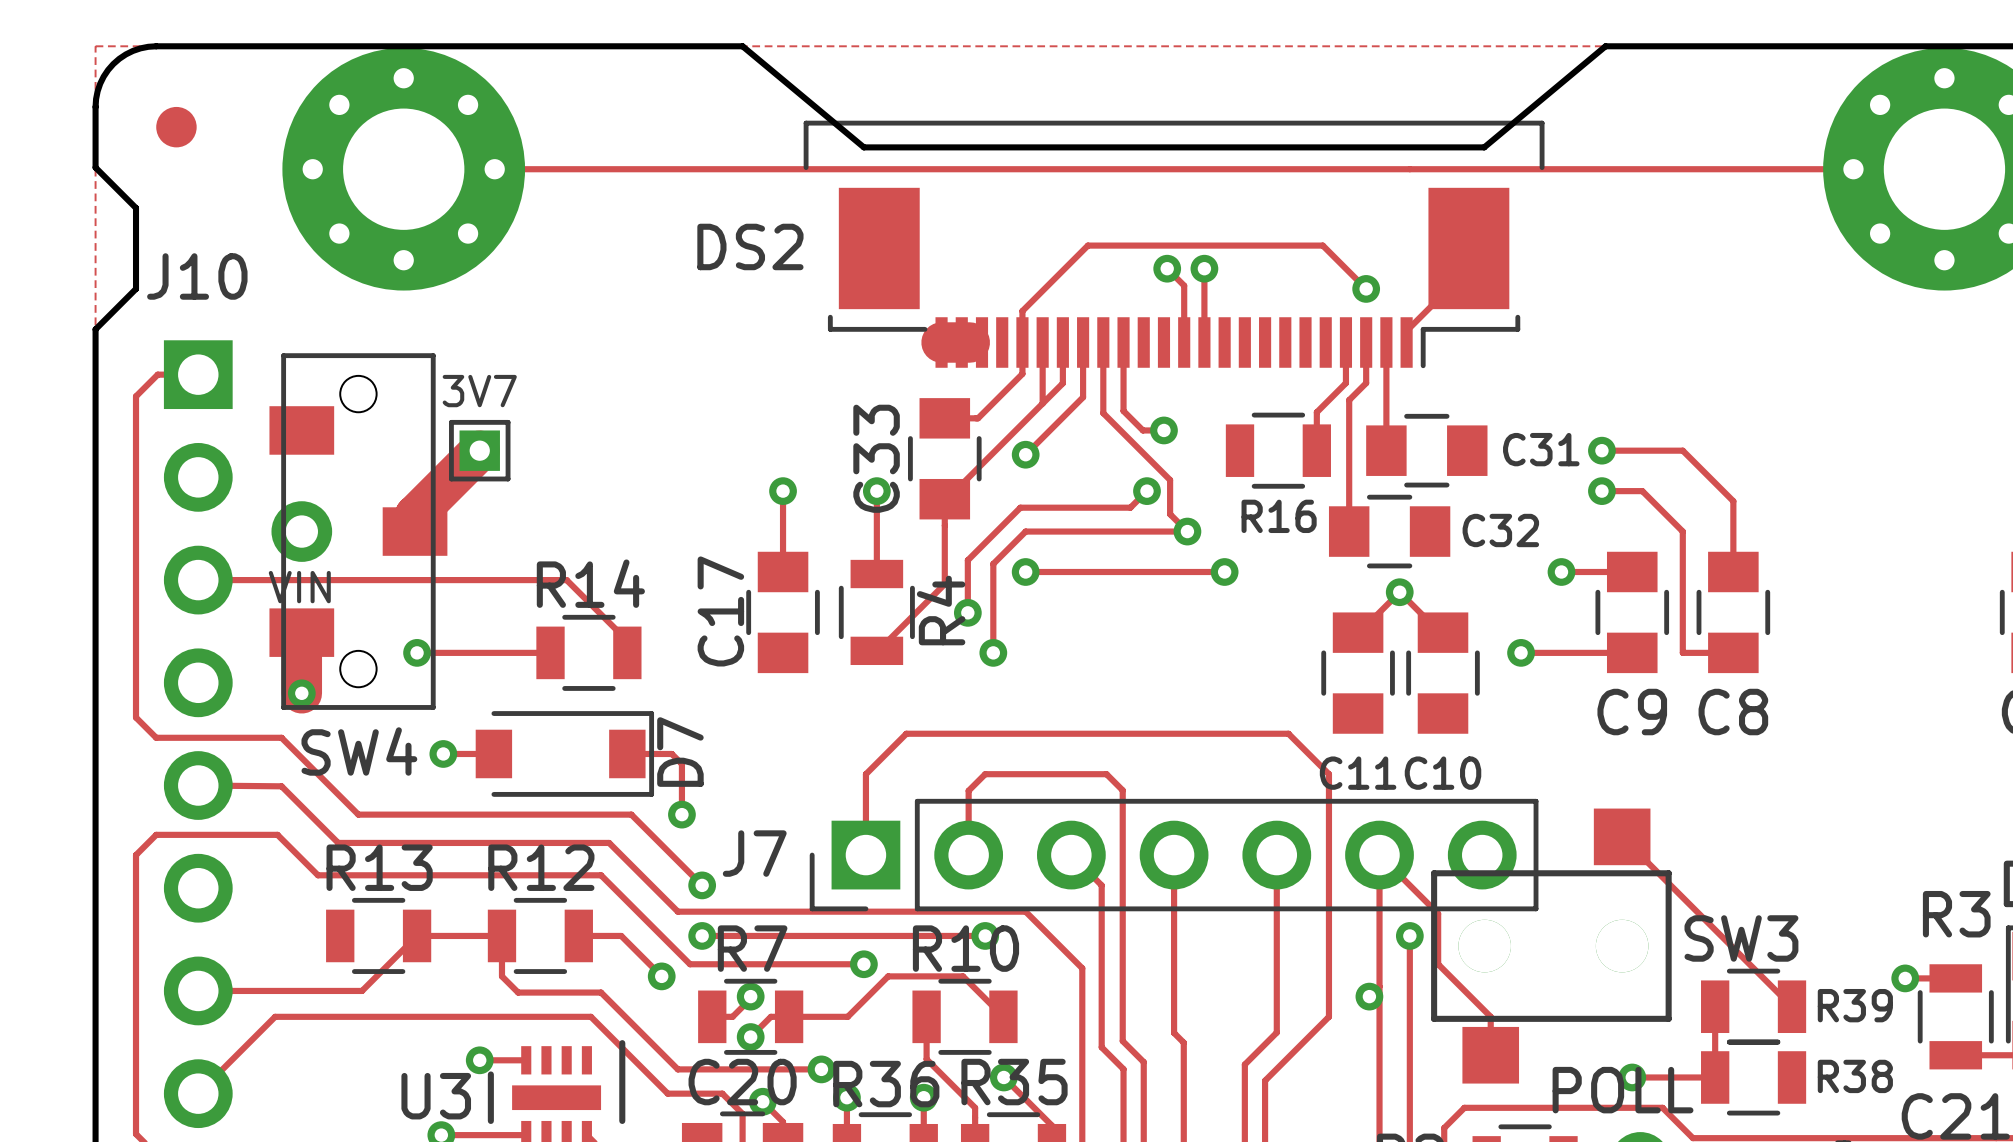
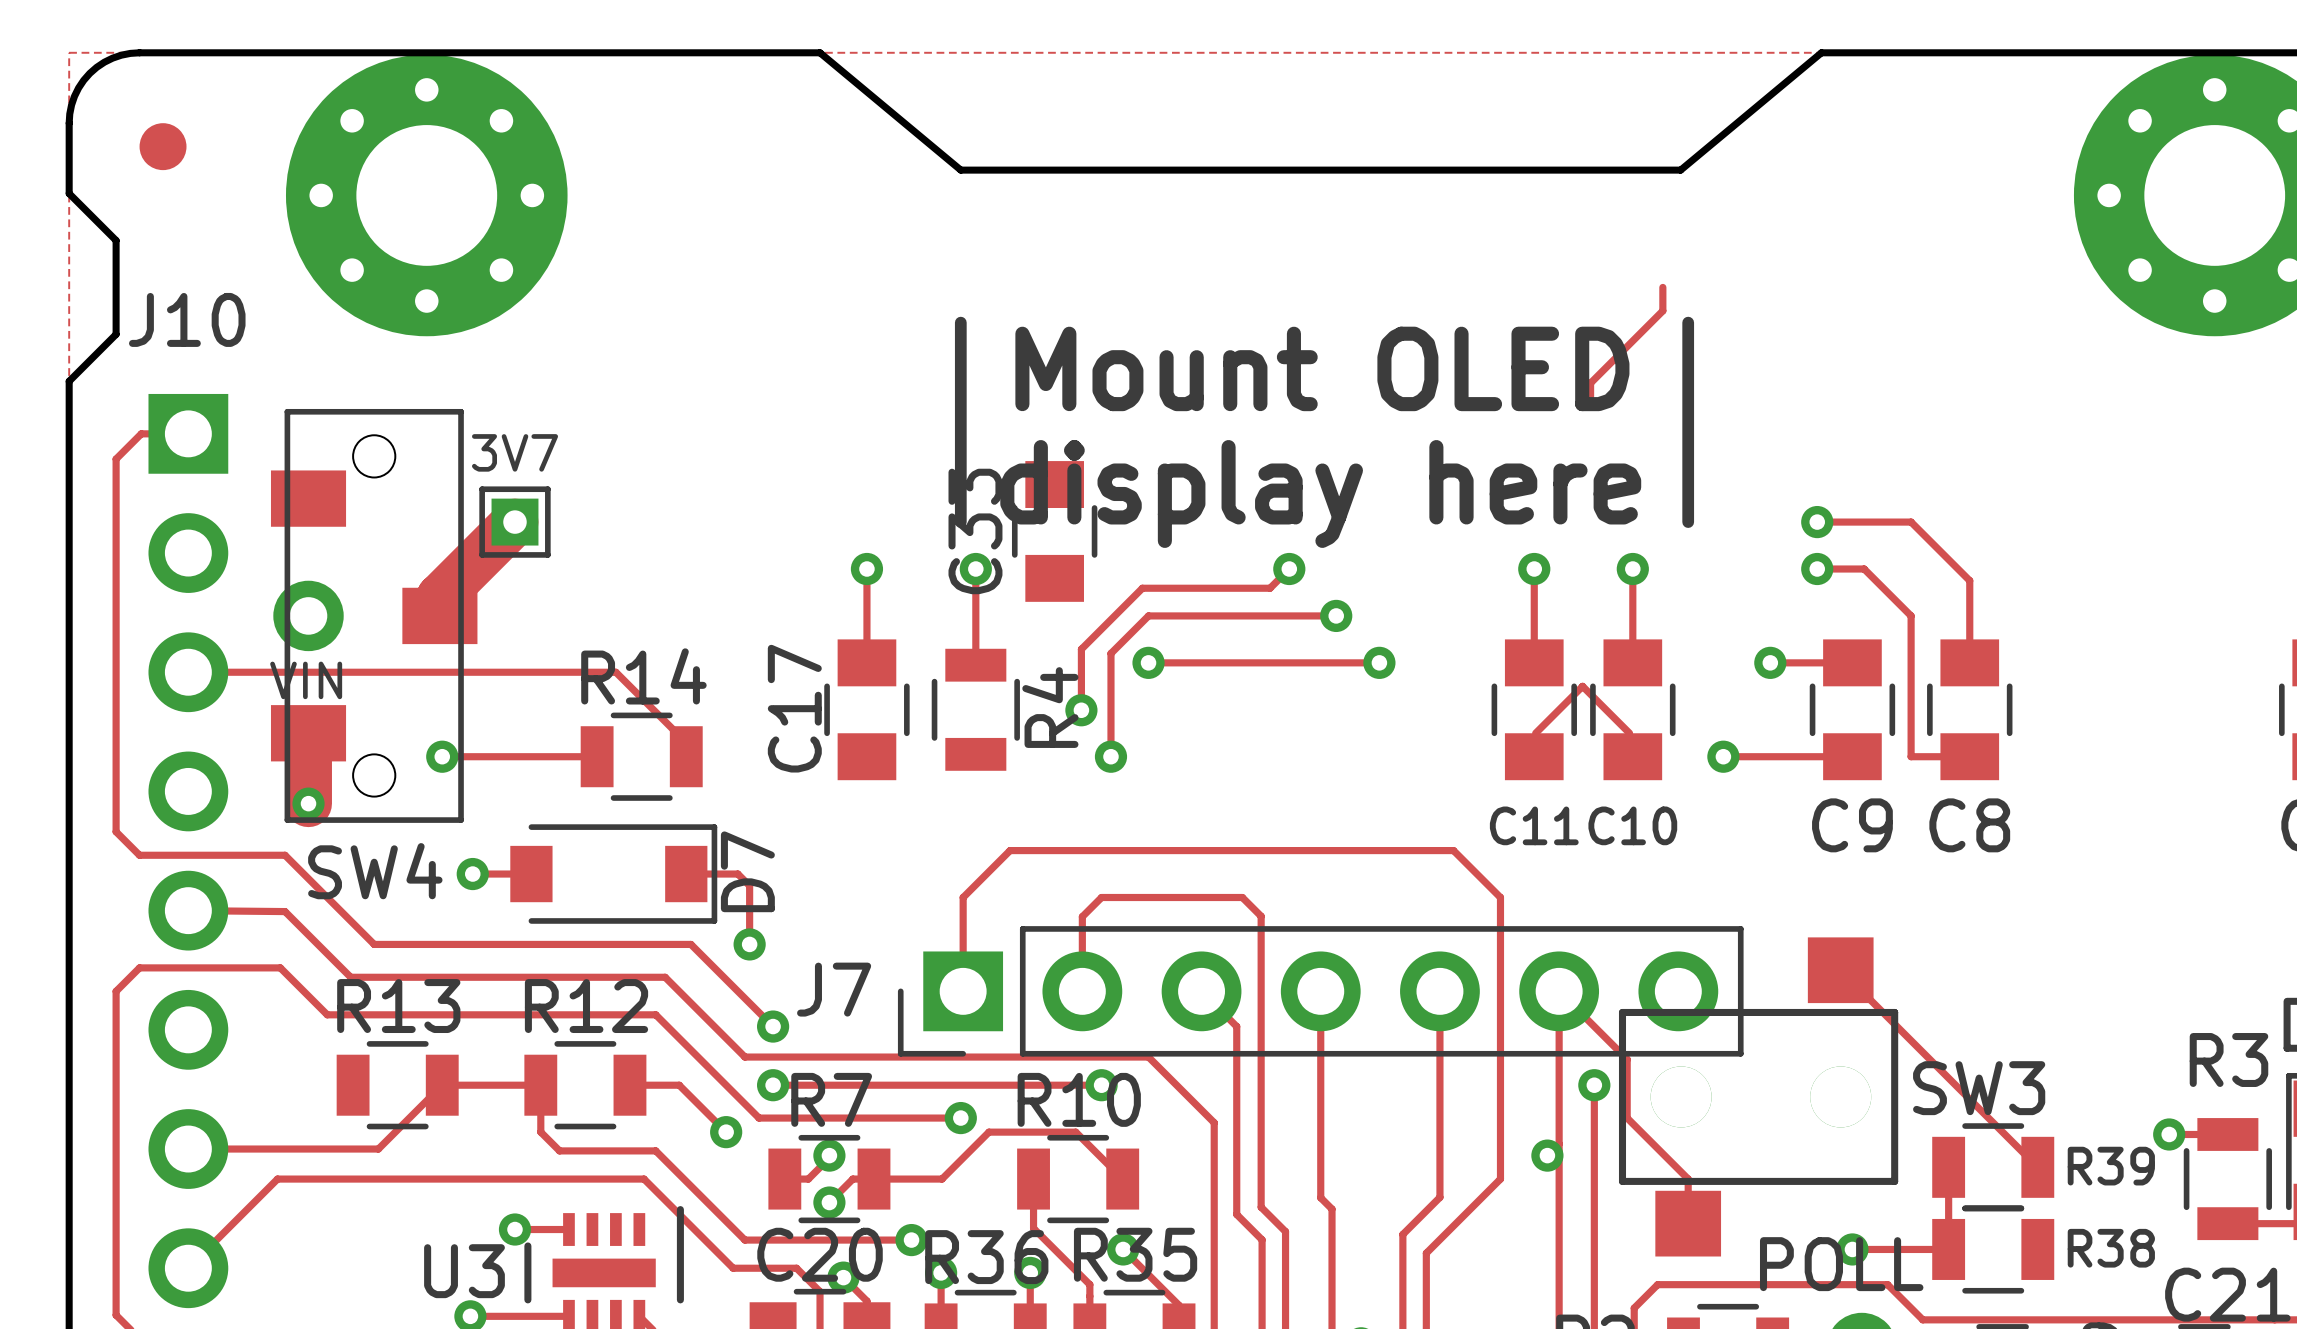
track: (403, 169) (1944, 169) -> none
DS2: (1174, 244) -> none
track: (1167, 268) (1184, 285) (1184, 342) -> none
via: (1167, 268) -> none
track: (1204, 268) (1204, 342) -> none
via: (1204, 268) -> none
line: none -> (960, 322) (960, 522)
line: none -> (1688, 322) (1688, 522)
track: (1366, 288) (1322, 245) (1087, 245) (1022, 311) (1022, 373) (978, 418) (944, 418) -> none
via: (1366, 288) -> none
text: none -> Mount OLED (1322, 368)
track: (941, 342) (969, 342) -> none
track: (1042, 342) (1042, 403) -> none
track: (1062, 342) (1062, 383) (946, 499) (944, 499) (944, 584) (878, 650) -> none
track: (1083, 342) (1083, 397) (1025, 454) -> none
track: (1103, 342) (1103, 413) (1170, 480) (1170, 514) (1187, 531) -> none
track: (1123, 342) (1123, 411) (1142, 430) (1163, 430) -> none
track: (1345, 342) (1345, 383) (1316, 412) (1316, 450) -> none
track: (1366, 342) (1366, 383) (1349, 400) (1349, 531) -> none
track: (1386, 342) (1386, 450) -> none
text: none -> display here (1320, 493)
via: (1163, 430) -> none
R16: (1278, 450) -> none
C31: (1426, 450) -> none
via: (1025, 454) -> none
track: none -> (1534, 569) (1534, 662)
via: none -> (1534, 569)
track: none -> (1632, 569) (1632, 662)
via: none -> (1632, 569)
C32: (1389, 531) -> none
via: (1399, 592) -> none
C11 position: (1358, 673) -> (1534, 709)
C10 position: (1443, 673) -> (1632, 709)

